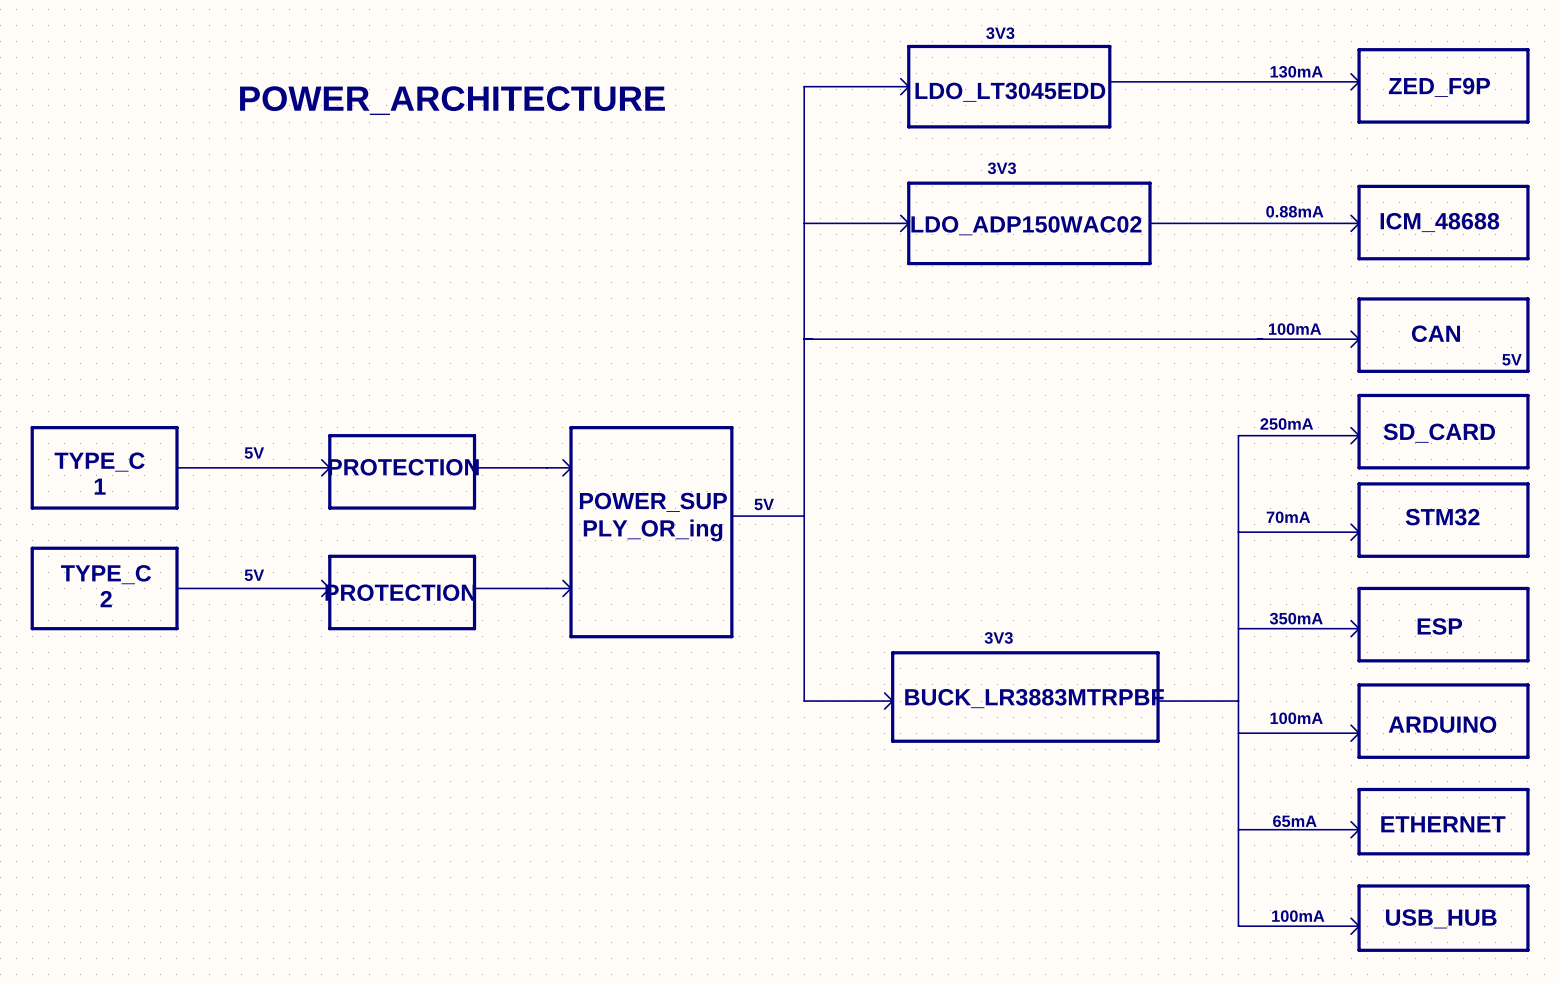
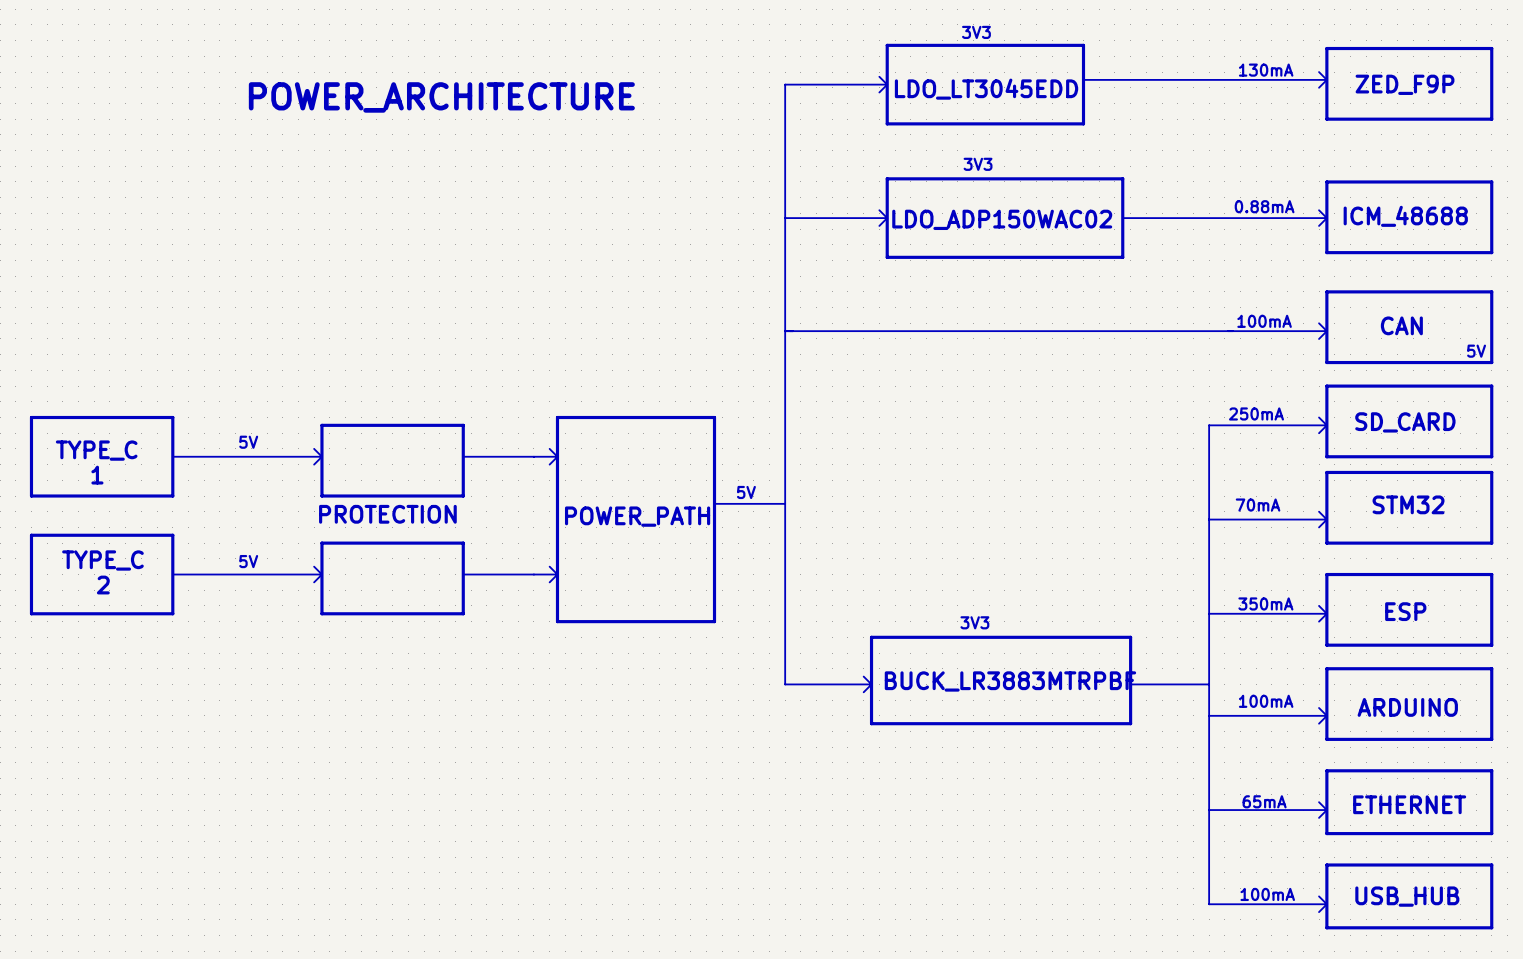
text: PROTECTION (403, 467) -> none
text: POWER_SUP (653, 502) -> none
text: none -> PROTECTION (387, 514)
text: PLY_OR_ing (653, 530) -> POWER_PATH (637, 516)
text: PROTECTION (400, 592) -> none

